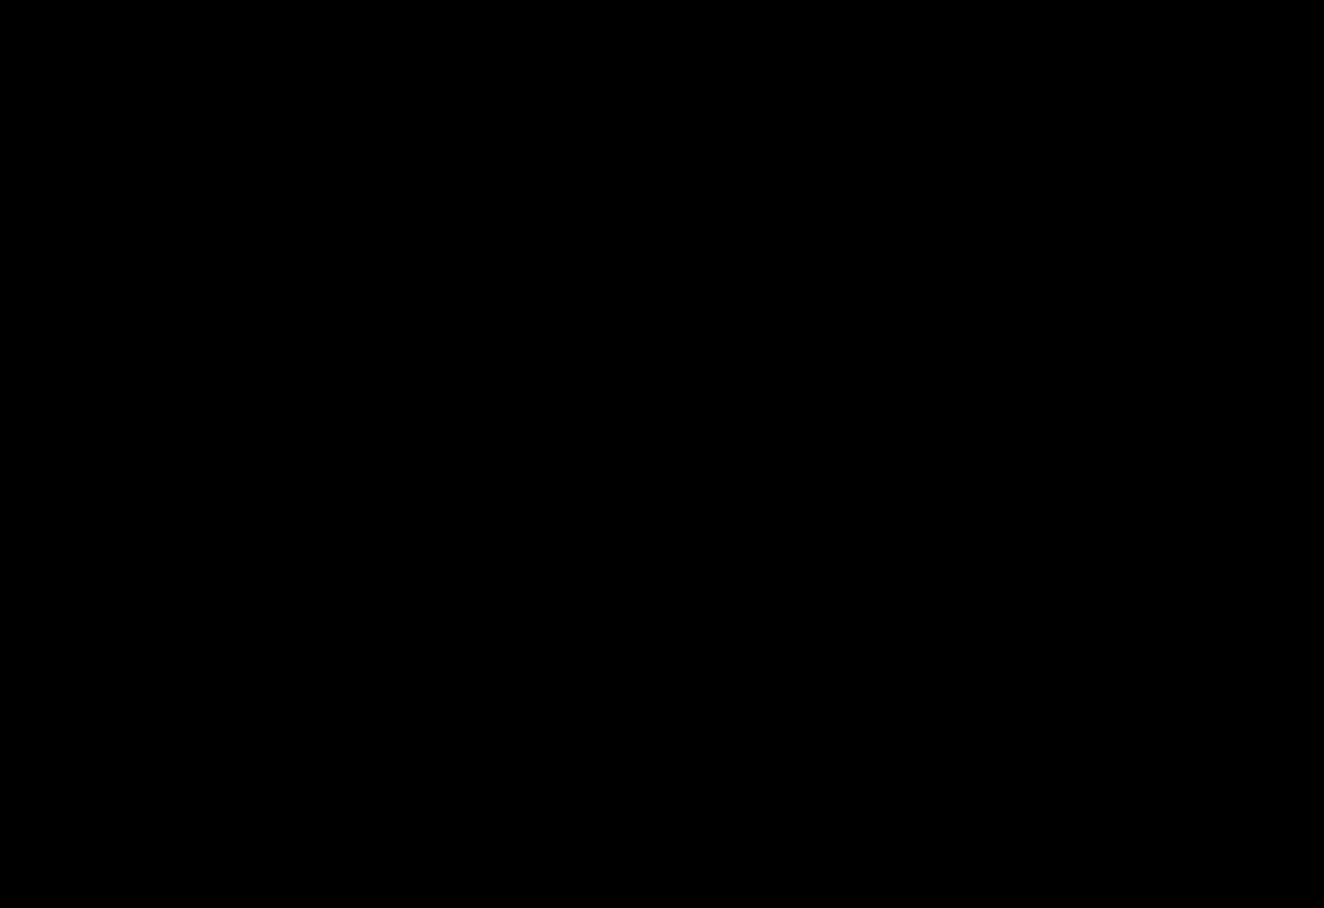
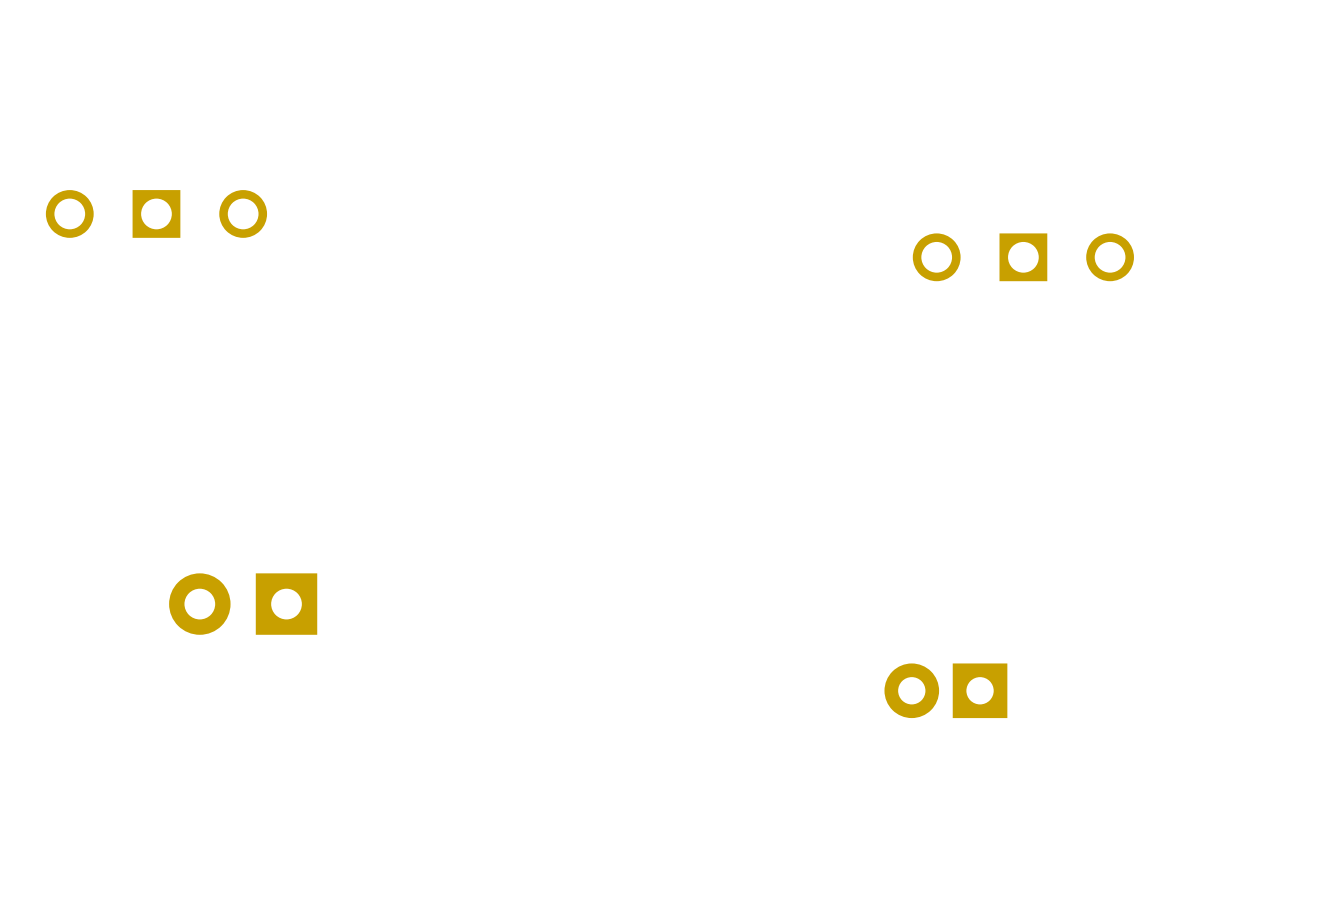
part: none -> (156, 213)
part: none -> (1023, 257)
part: none -> (243, 604)
part: none -> (945, 690)

